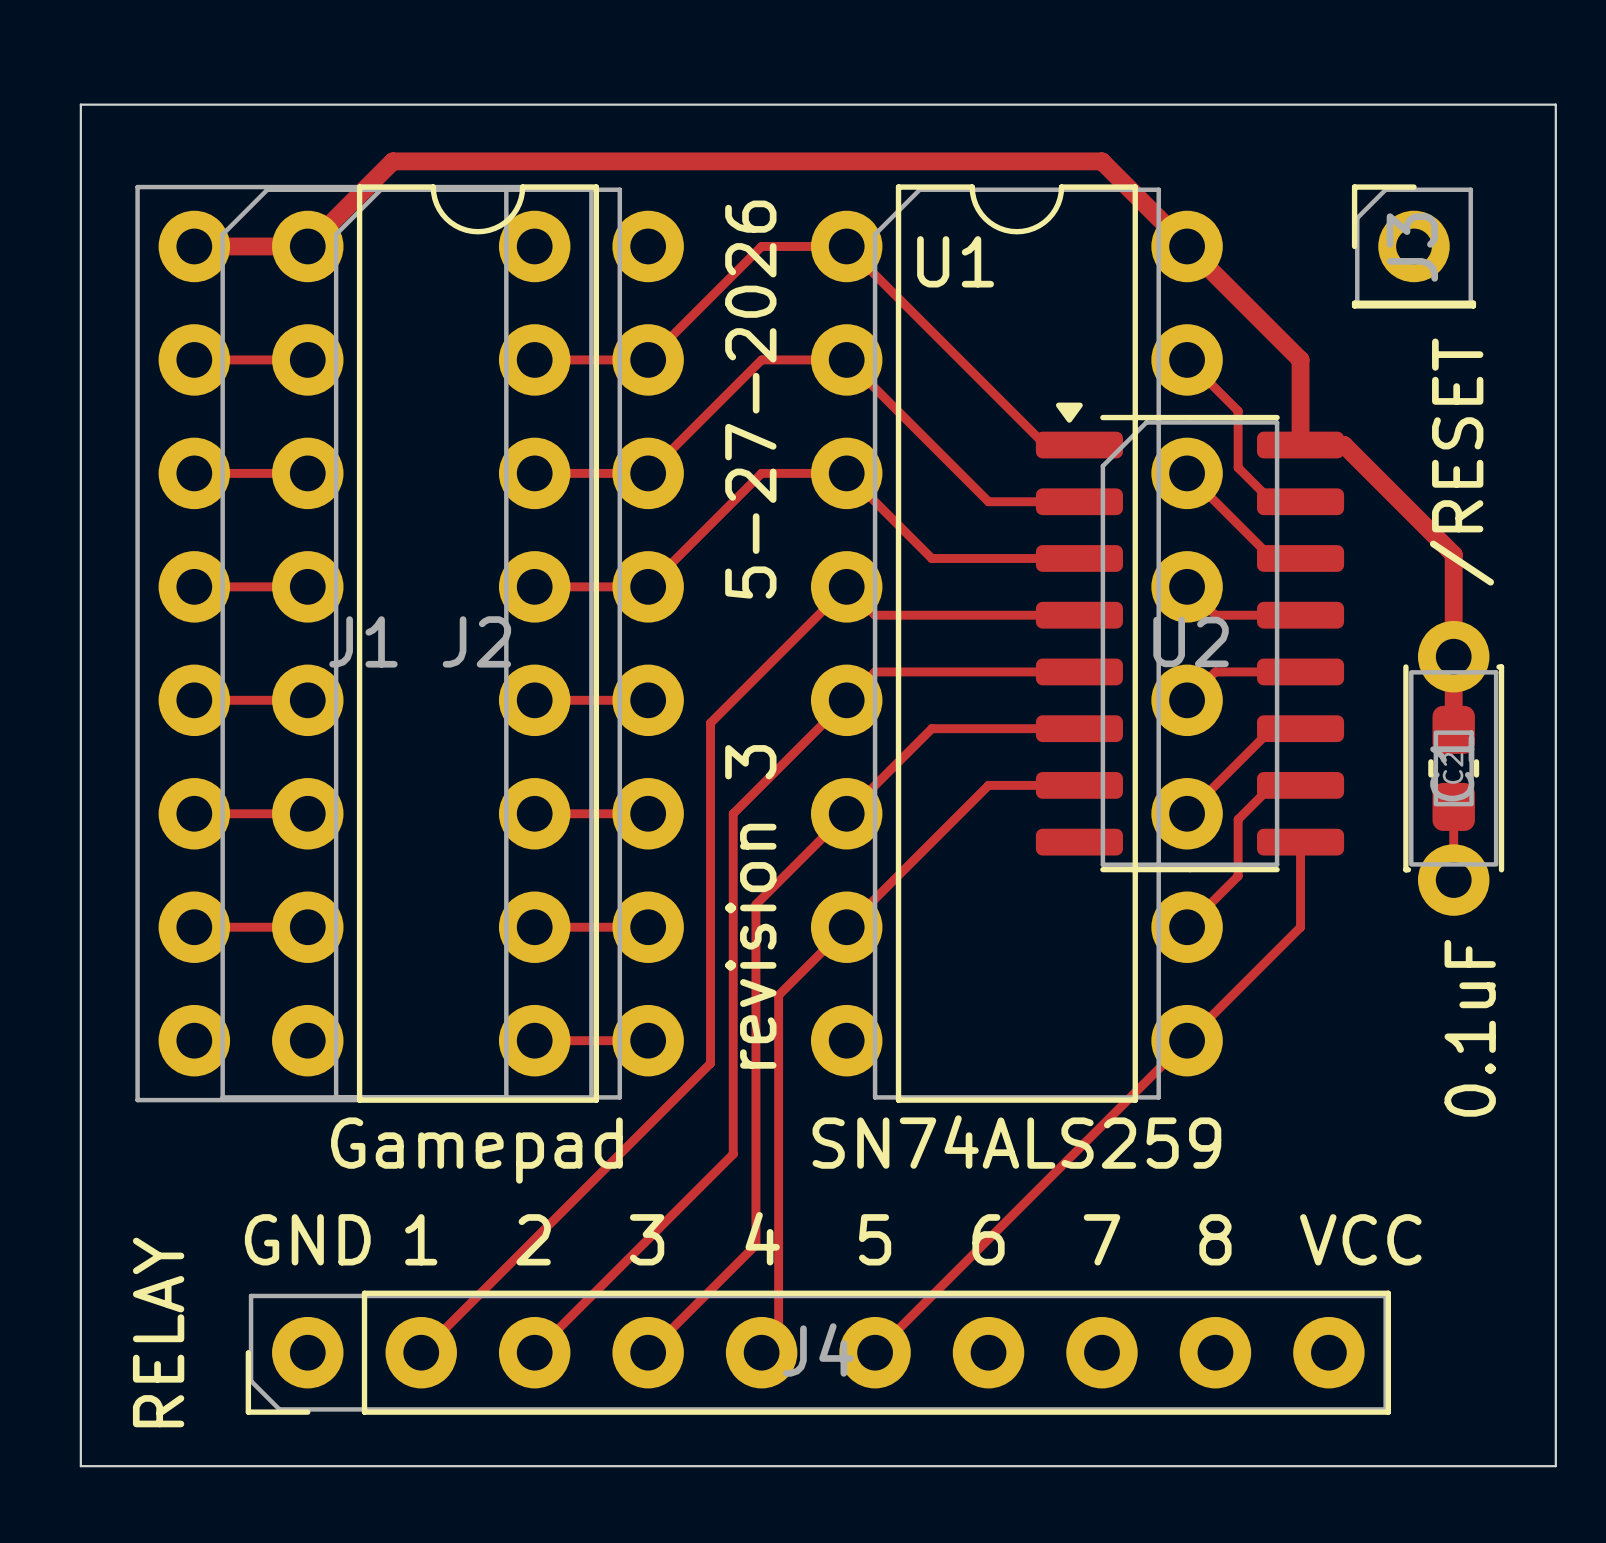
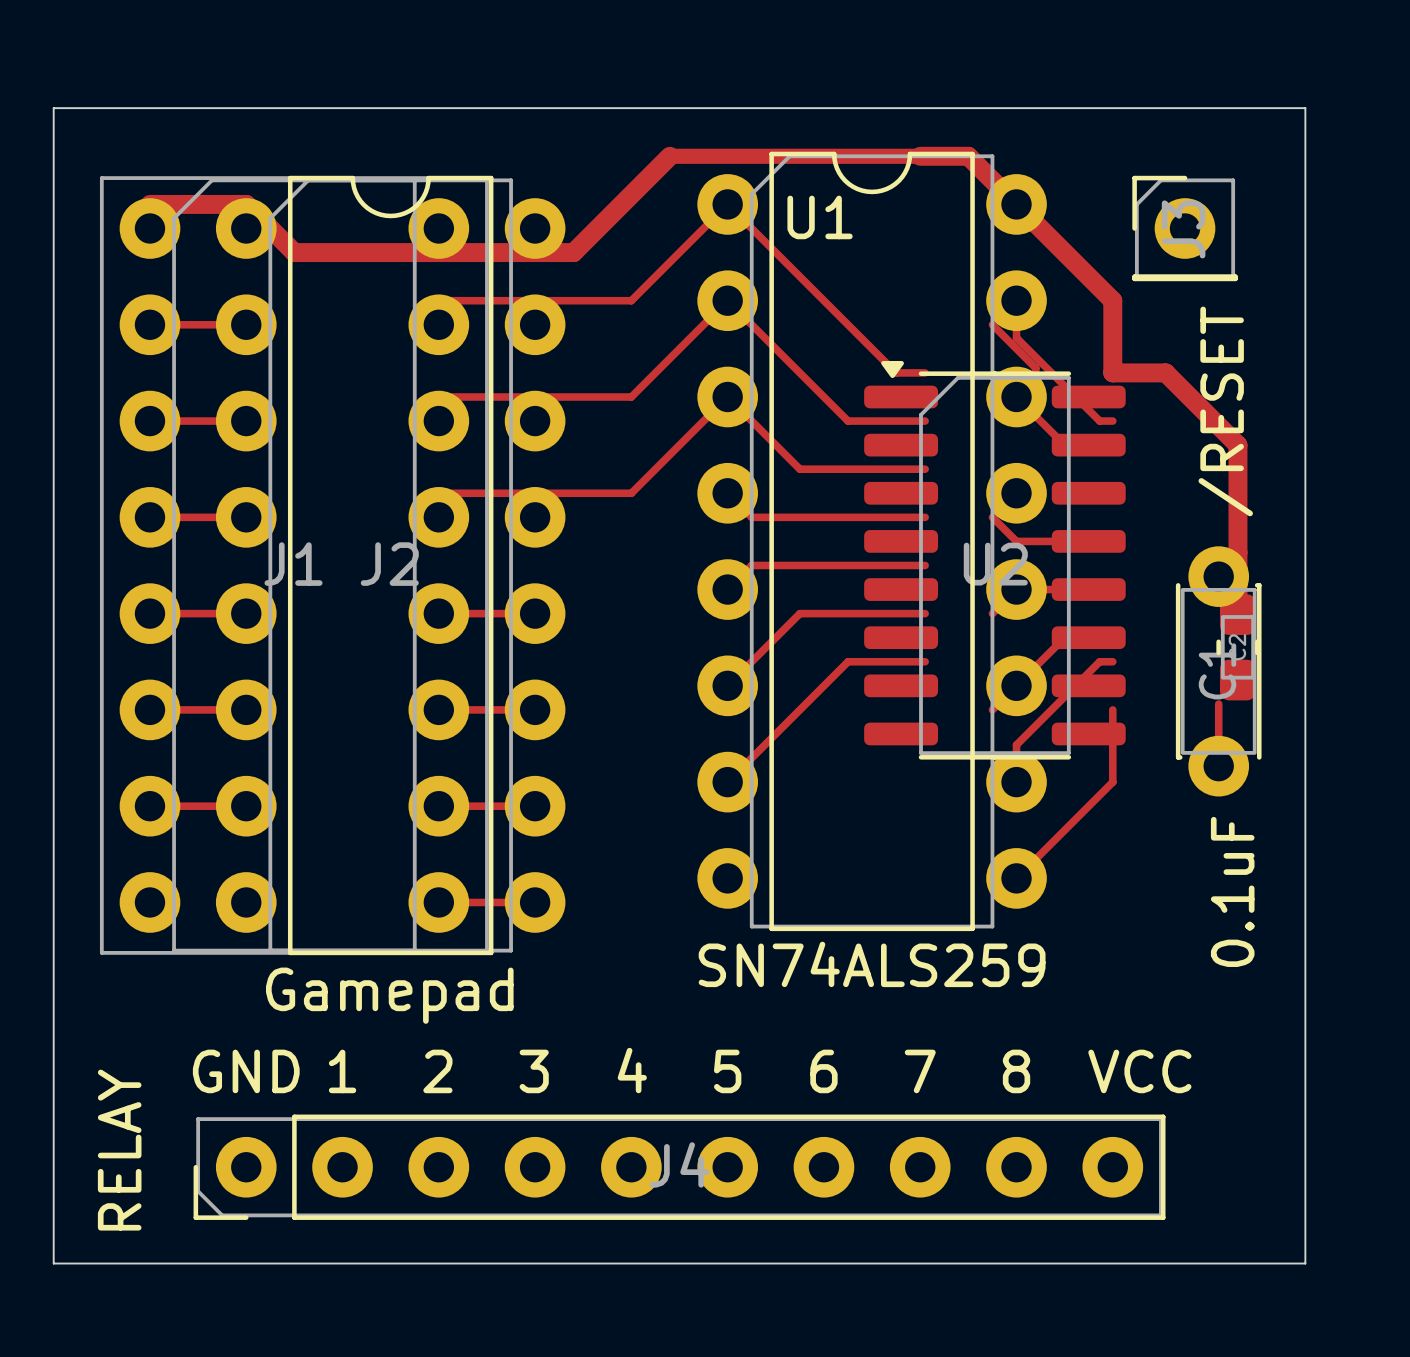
track: (806, 161) (392, 161) (307, 246) (194, 246) -> (669, 156) (573, 252) (294, 252) (246, 204) (149, 204)
track: (1101, 161) (1300, 359) (1300, 445) (1344, 445) (1453, 554) (1453, 729) -> (920, 156) (968, 156) (1112, 300) (1112, 372) (1165, 372) (1237, 445) (1237, 614)
track: none -> (438, 300) (631, 300) (727, 204) (896, 372) (925, 372)
track: none -> (1016, 300) (1016, 337) (1099, 421) (1112, 421)
track: (534, 359) (648, 359) (761, 246) (846, 246) (1045, 445) (1079, 445) -> none
track: none -> (438, 396) (631, 396) (727, 300) (848, 421) (925, 421)
track: (534, 473) (648, 473) (761, 359) (846, 359) (988, 501) (1079, 501) -> none
track: (1187, 473) (1272, 558) (1300, 558) -> none
track: none -> (925, 469) (799, 469) (727, 396) (631, 493) (438, 493)
track: none -> (727, 493) (751, 517) (925, 517)
track: (1079, 558) (931, 558) (846, 473) (761, 473) (648, 586) (534, 586) -> none
track: (1079, 615) (875, 615) (846, 586) (710, 723) (710, 1063) (421, 1352) -> none
text: revision 3 5-27-2026 (750, 634) -> none
U1 position: (1016, 643) -> (872, 541)
track: none -> (925, 565) (751, 565) (727, 589)
track: (1079, 671) (875, 671) (733, 813) (733, 1154) (534, 1352) -> none
track: (931, 728) (1079, 728) -> (775, 637) (799, 613) (925, 613)
track: none -> (1112, 661) (1099, 661) (1016, 744) (1016, 782)
C2 position: (1453, 768) -> (1237, 647)
track: (875, 785) (755, 904) (755, 1244) (648, 1352) -> none
track: (988, 785) (1079, 785) -> (823, 685) (848, 661) (925, 661)
track: (1300, 785) (1272, 785) (1238, 819) (1238, 876) (1187, 927) -> none
track: (1300, 842) (1300, 927) -> (1112, 709) (1112, 782) (1088, 806)
track: (875, 898) (778, 995) (778, 1335) (761, 1352) -> none
track: (1215, 1012) (875, 1352) -> none

